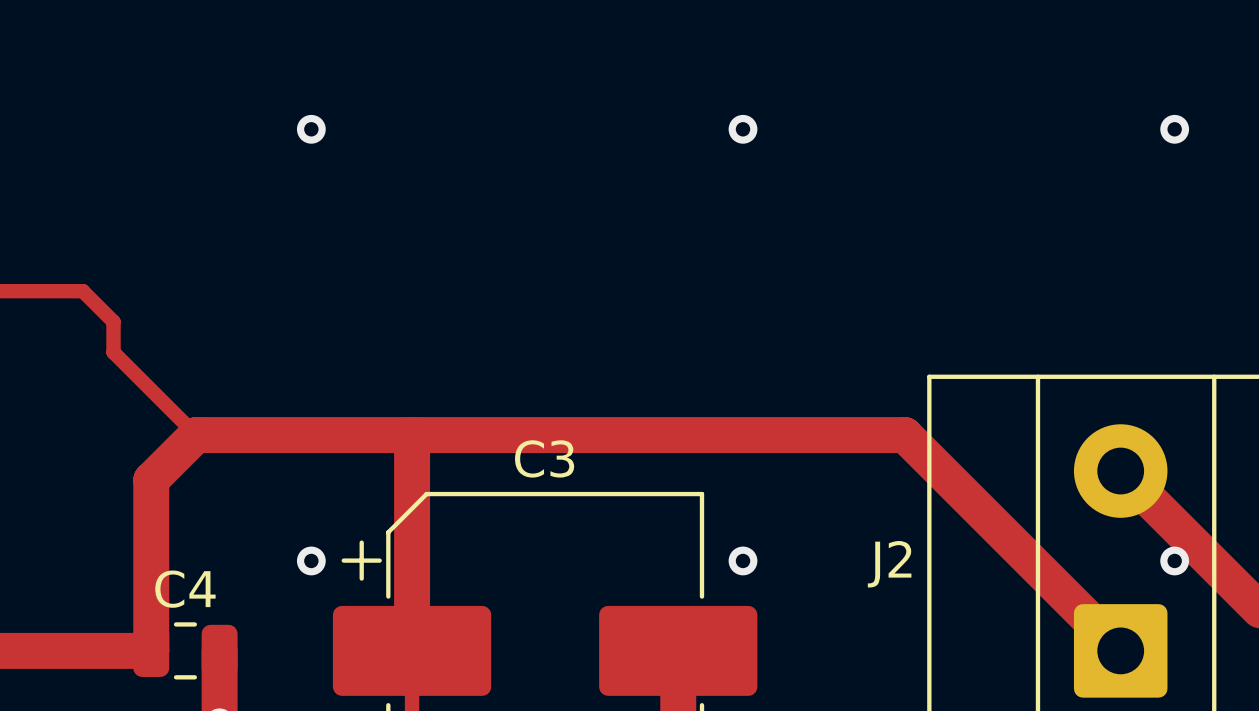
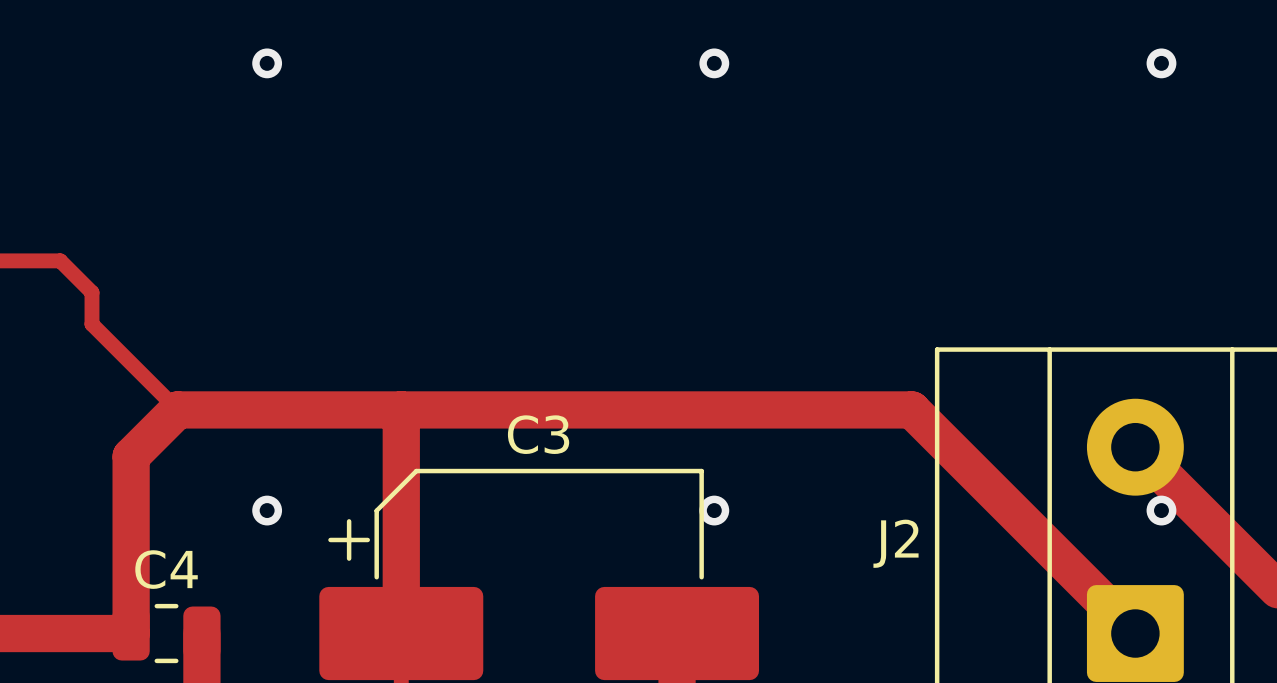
via position: (311, 129) -> (267, 63)
via position: (743, 129) -> (714, 63)
via position: (1174, 129) -> (1161, 63)
via position: (311, 560) -> (267, 510)
via position: (743, 560) -> (714, 510)
via position: (1174, 560) -> (1161, 510)

